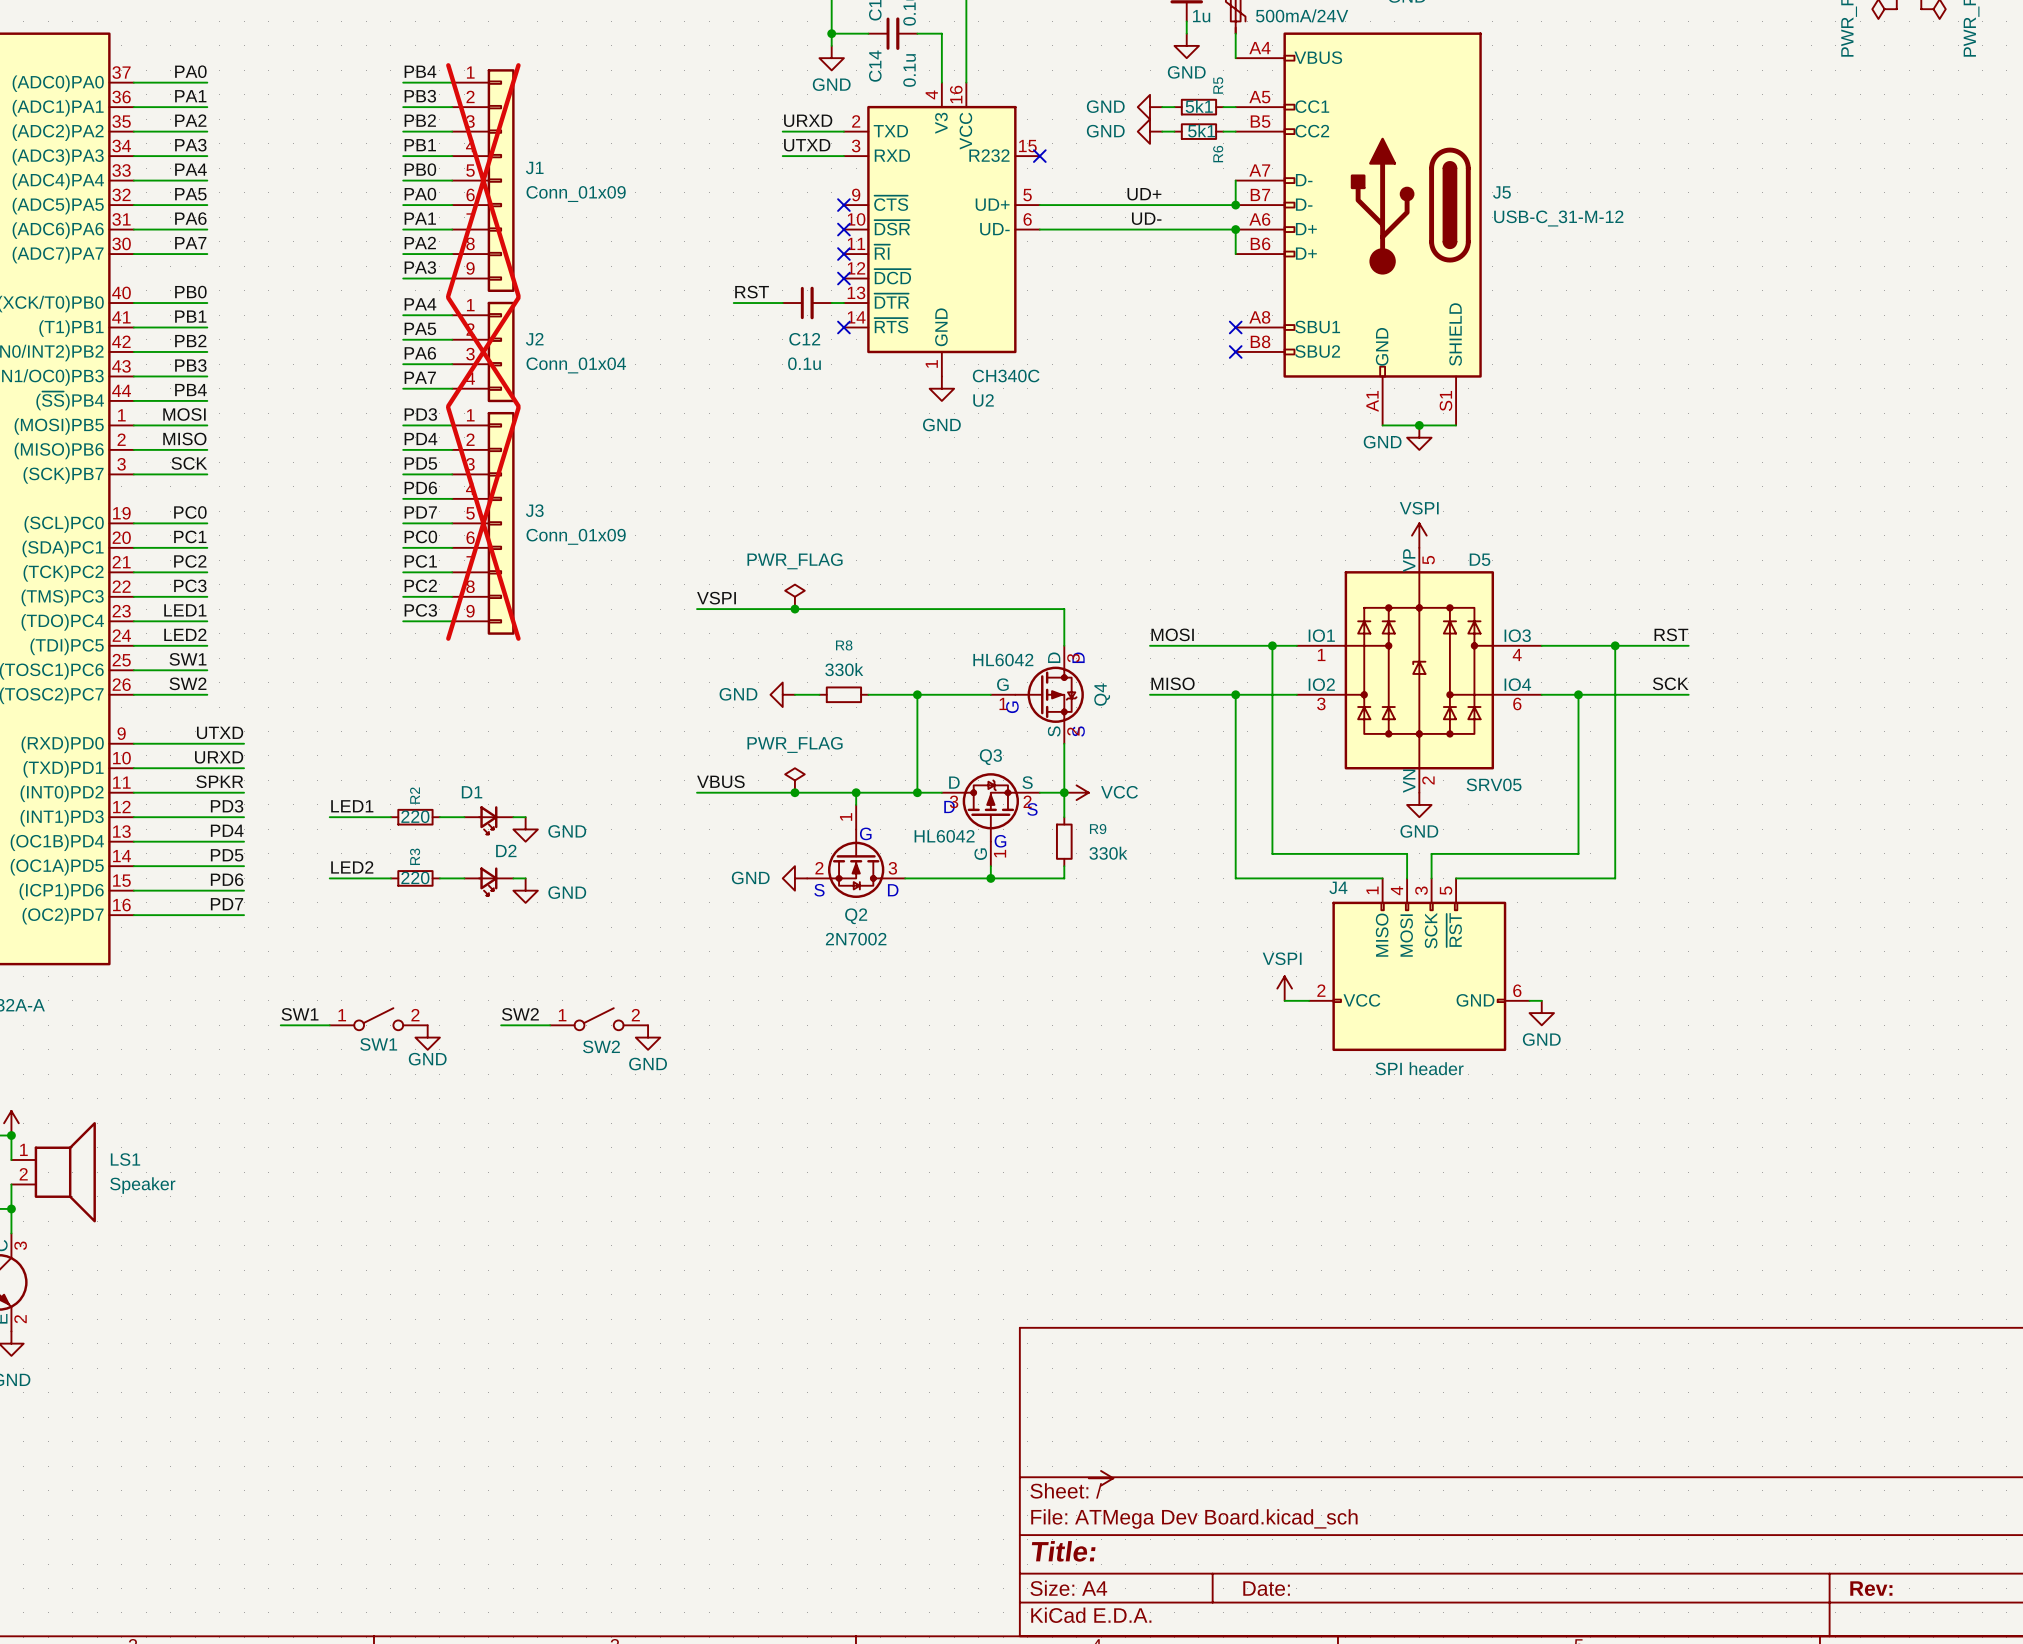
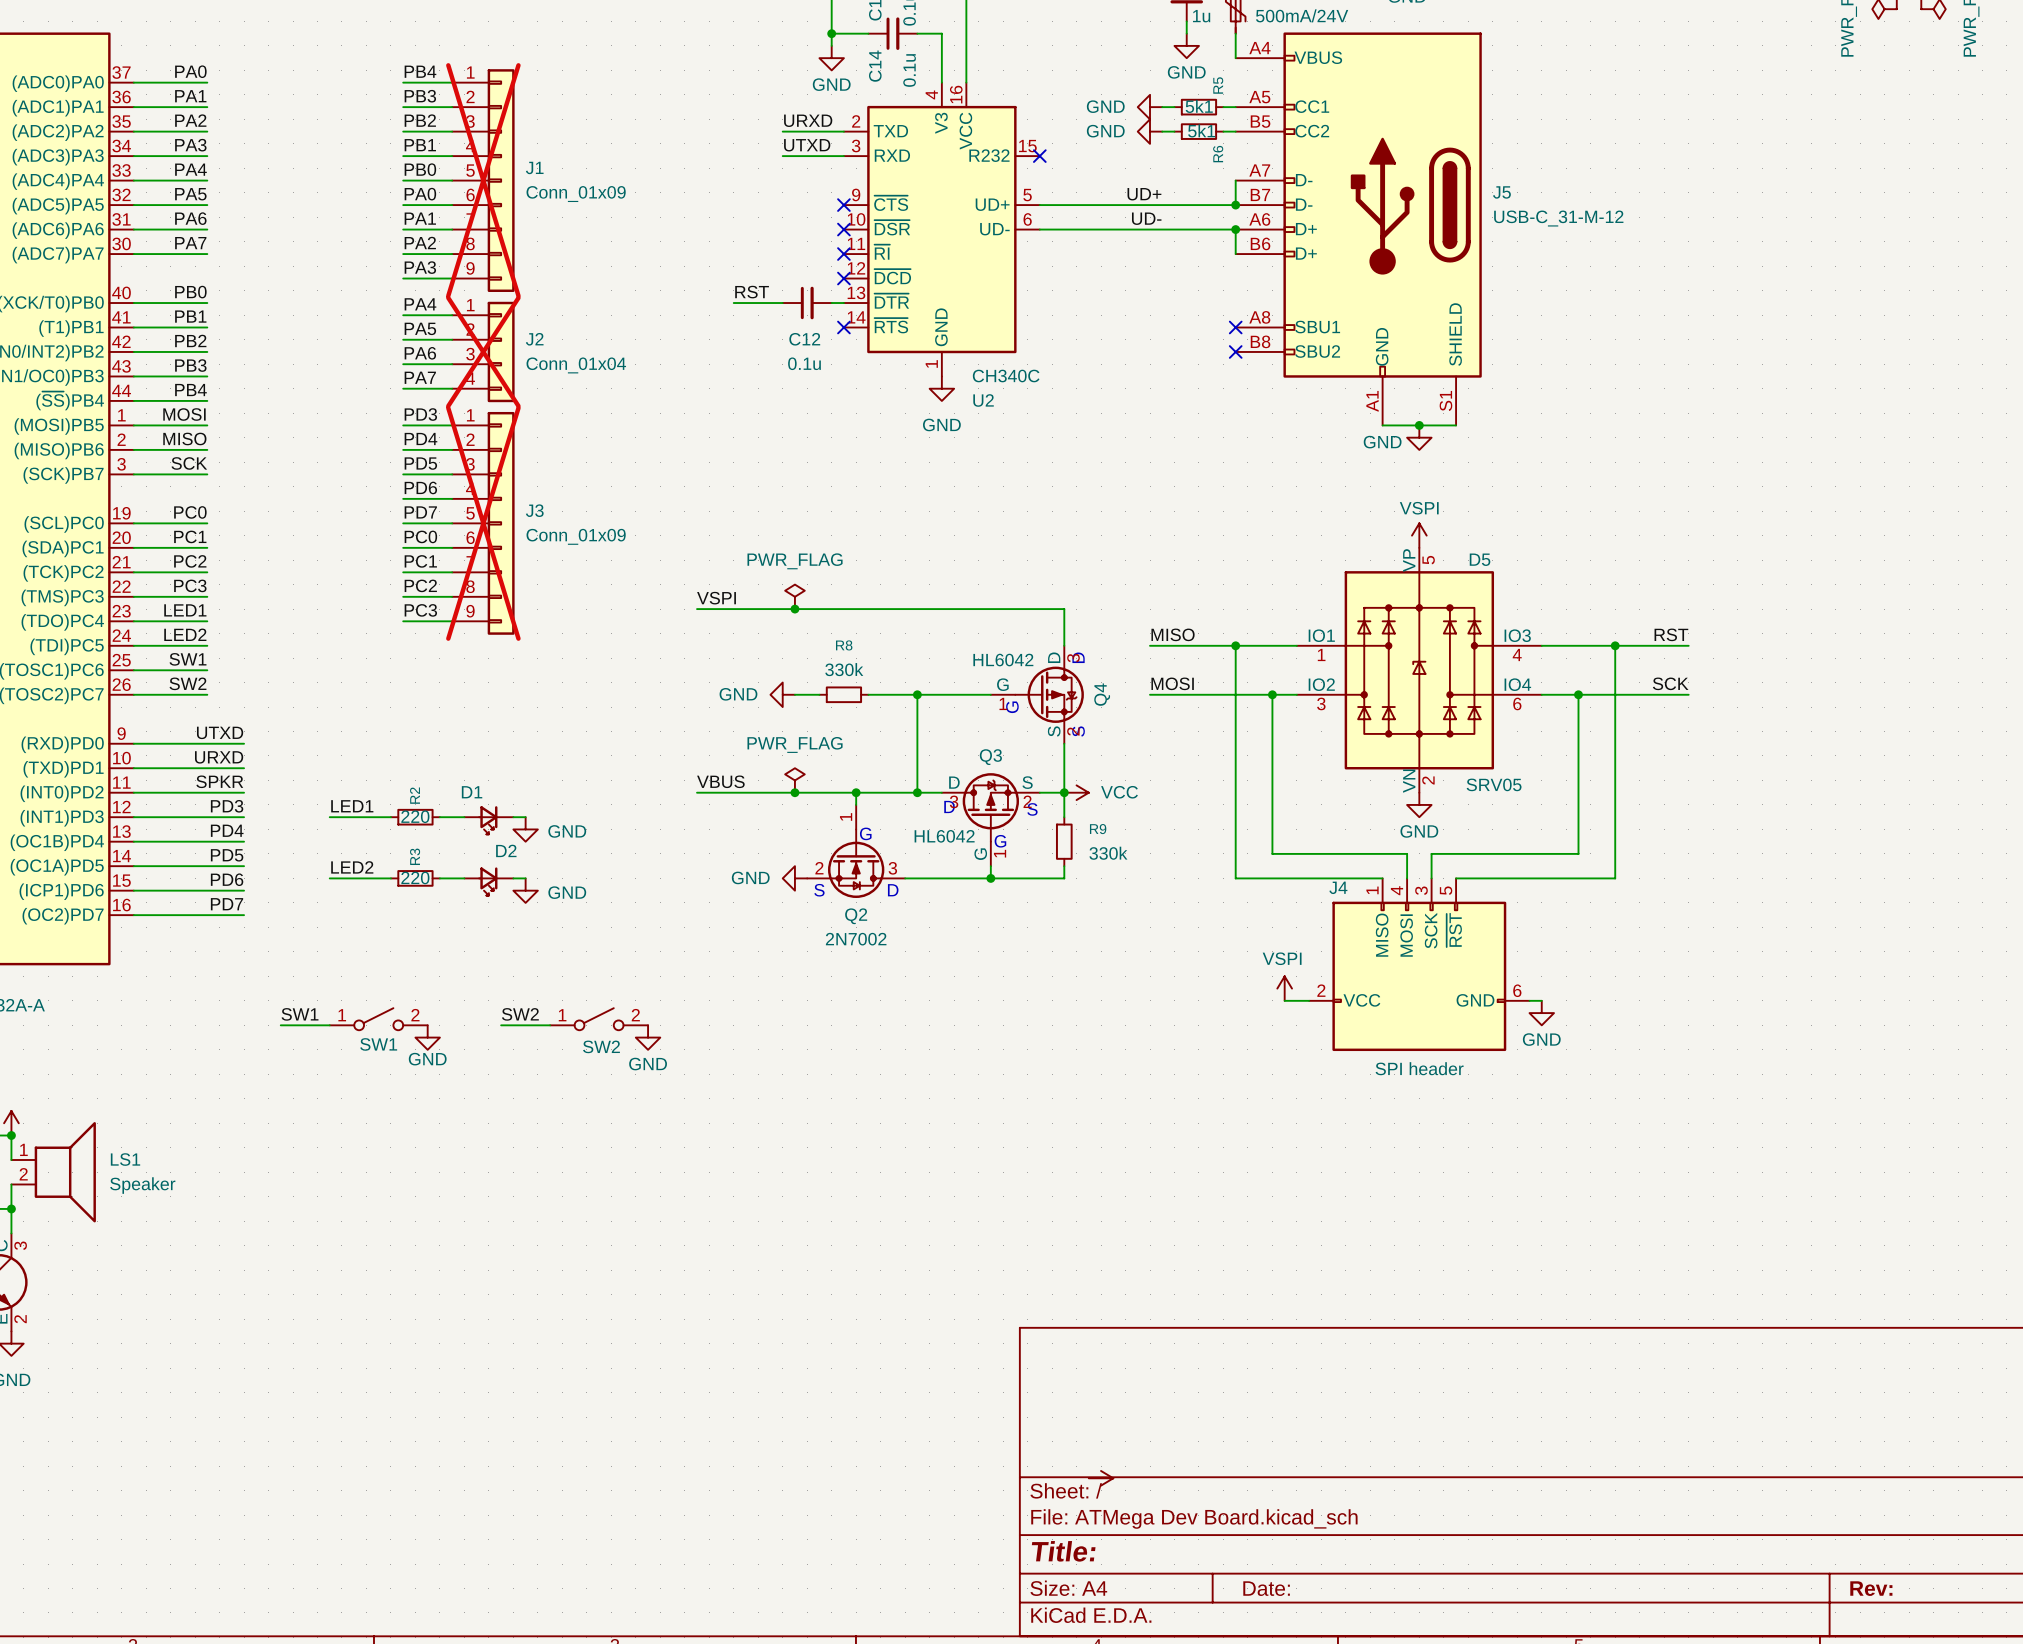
label: MOSI (1172, 634) -> MISO (1173, 634)
junction: none -> (1235, 645)
wire: (1272, 645) (1272, 694) -> (1235, 645) (1235, 694)
junction: (1272, 645) -> none
label: MISO (1173, 683) -> MOSI (1172, 683)
junction: (1235, 694) -> none
junction: none -> (1272, 694)

